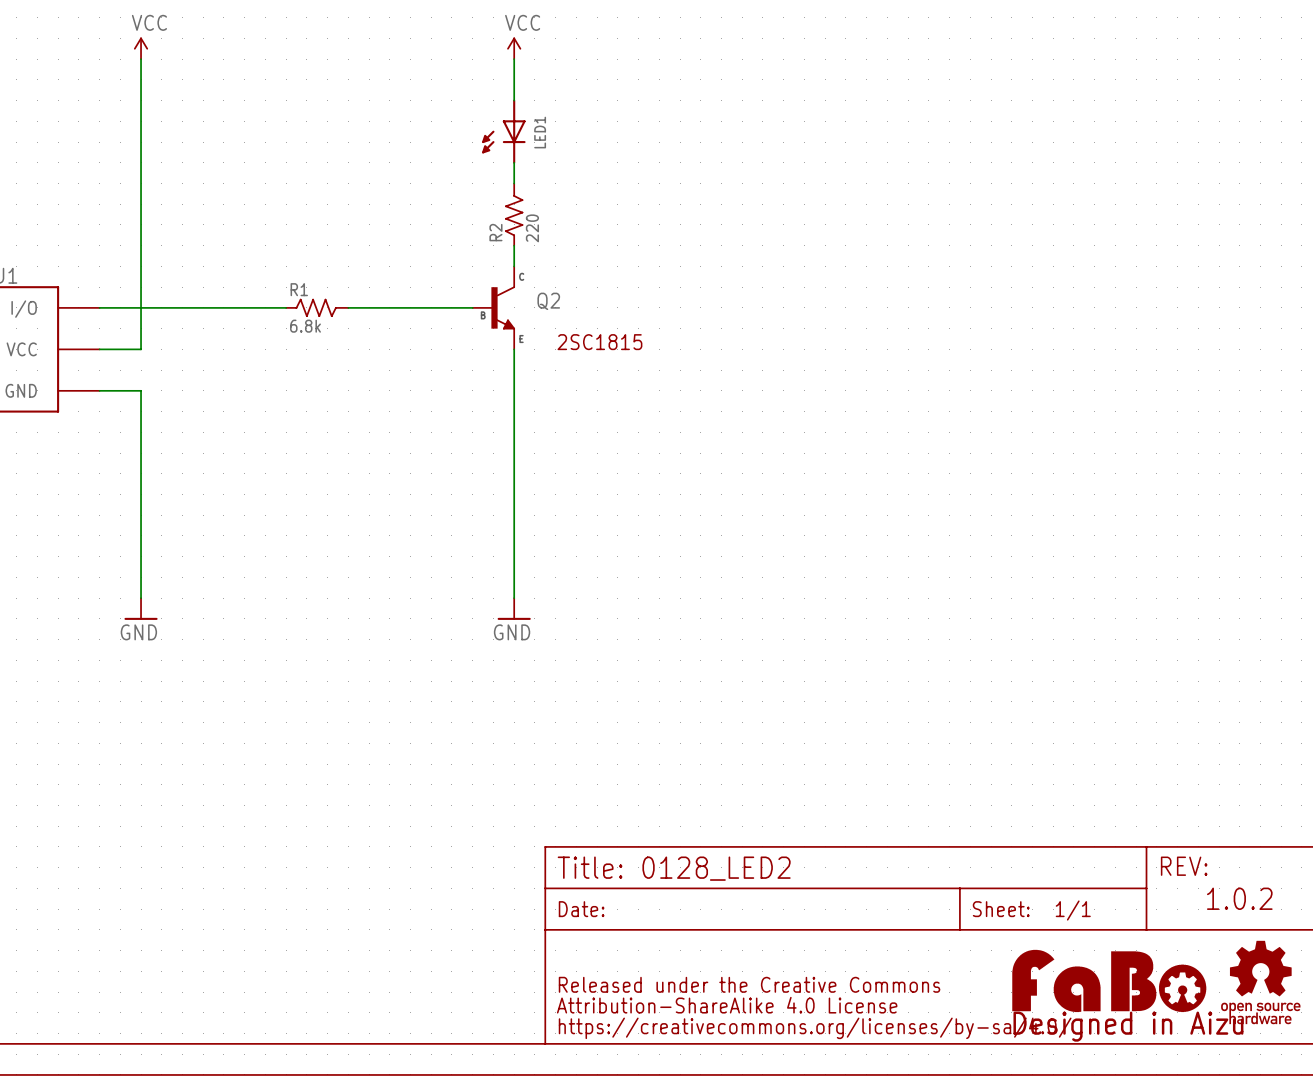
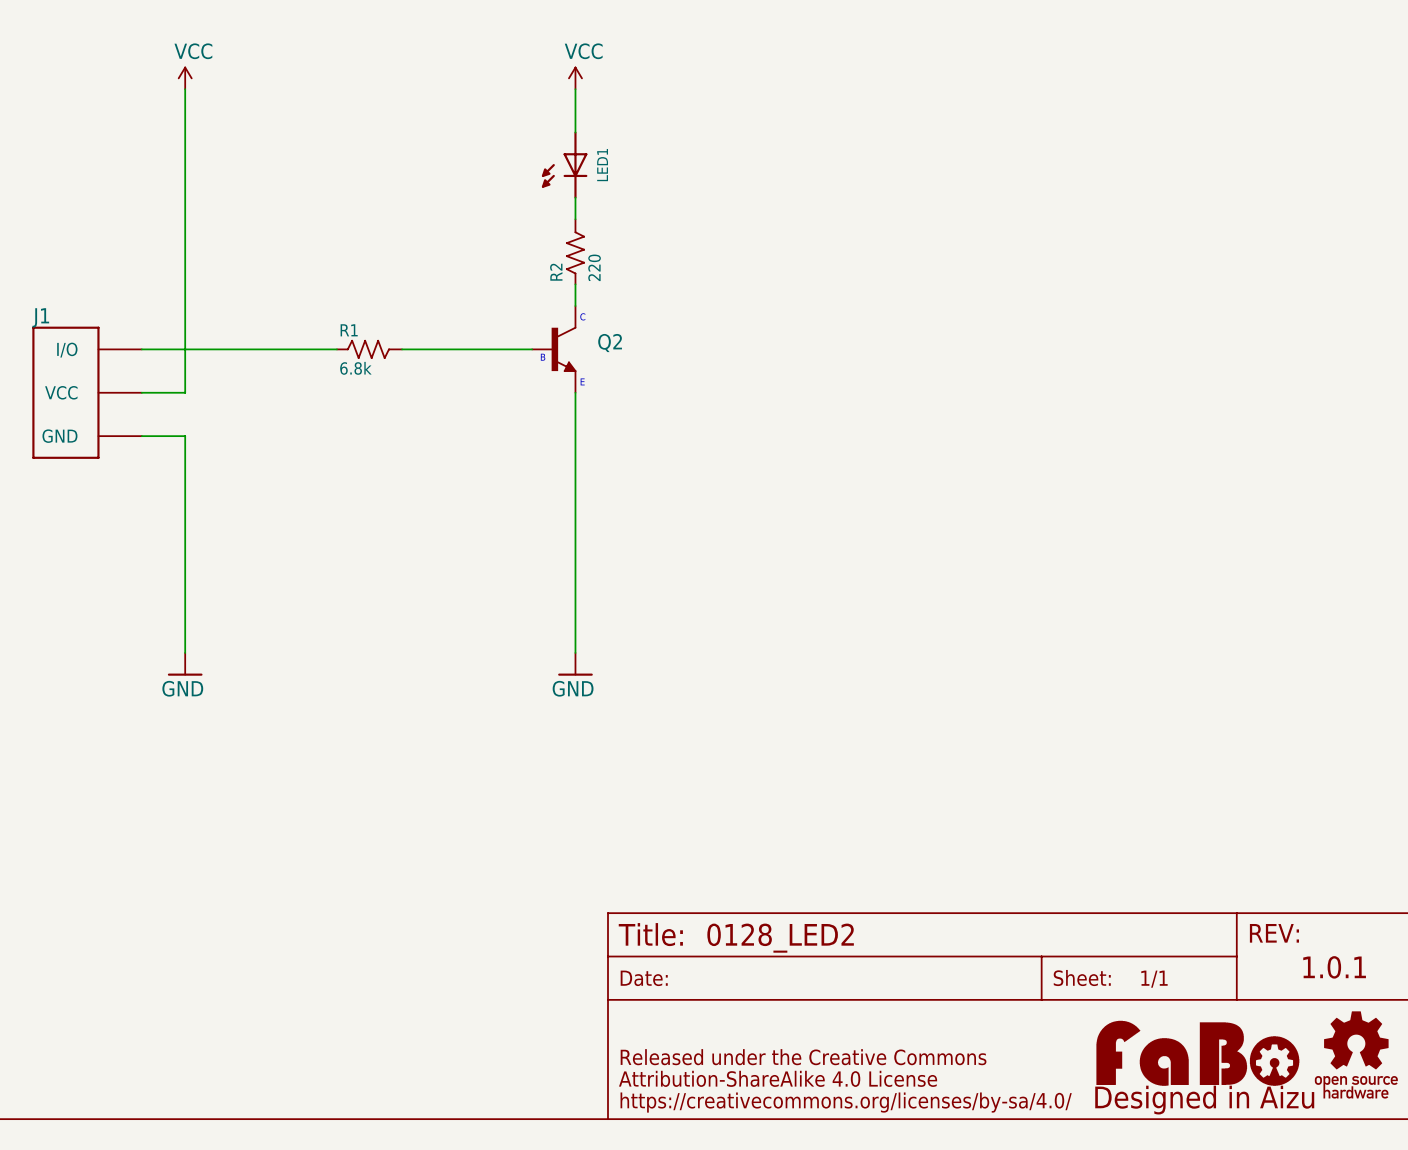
text: 2SC1815 (599, 342) -> none
text: 1.0.2 (1239, 898) -> 1.0.1 (1334, 967)

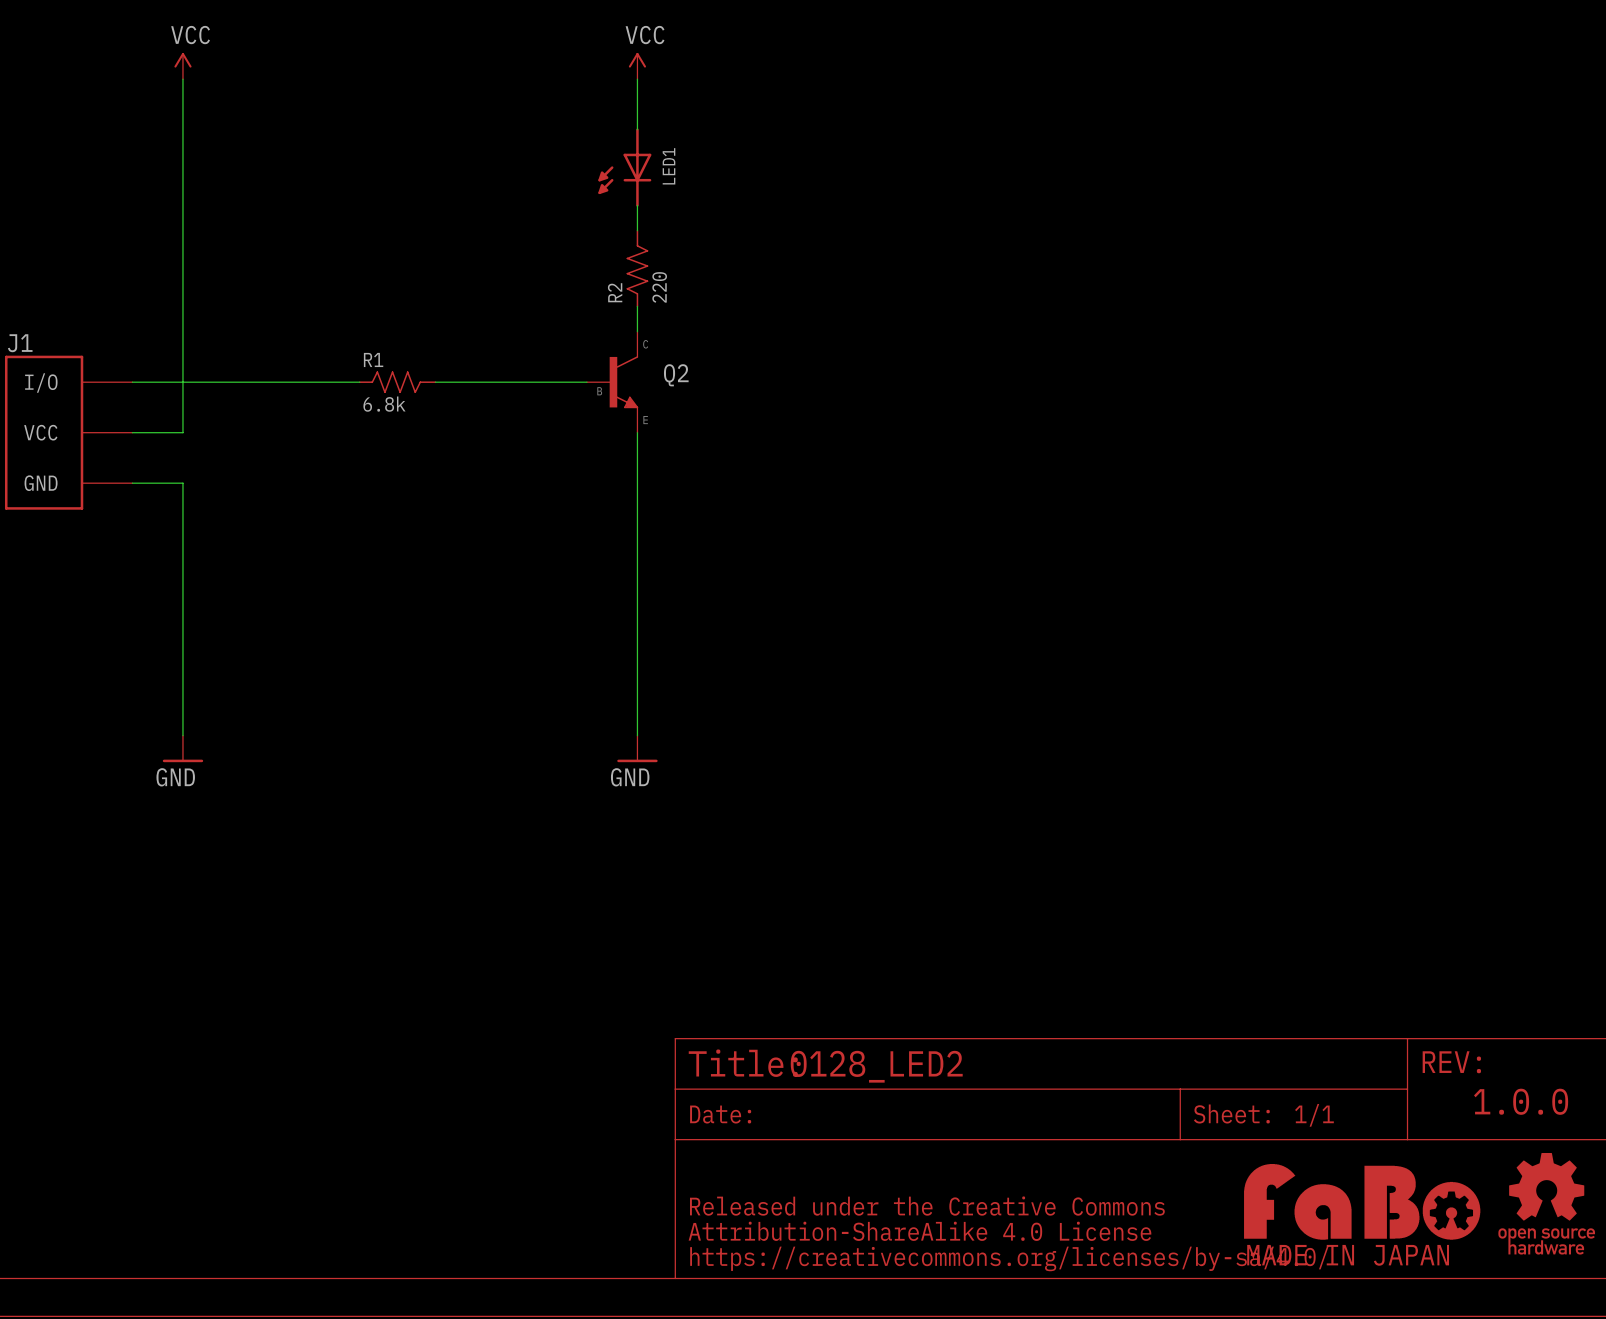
text: 1.0.1 (1334, 967) -> 1.0.0 (1521, 1101)
part text: Designed in Aizu (1204, 1100) -> none
part text: none -> MADE IN JAPAN (1348, 1255)

